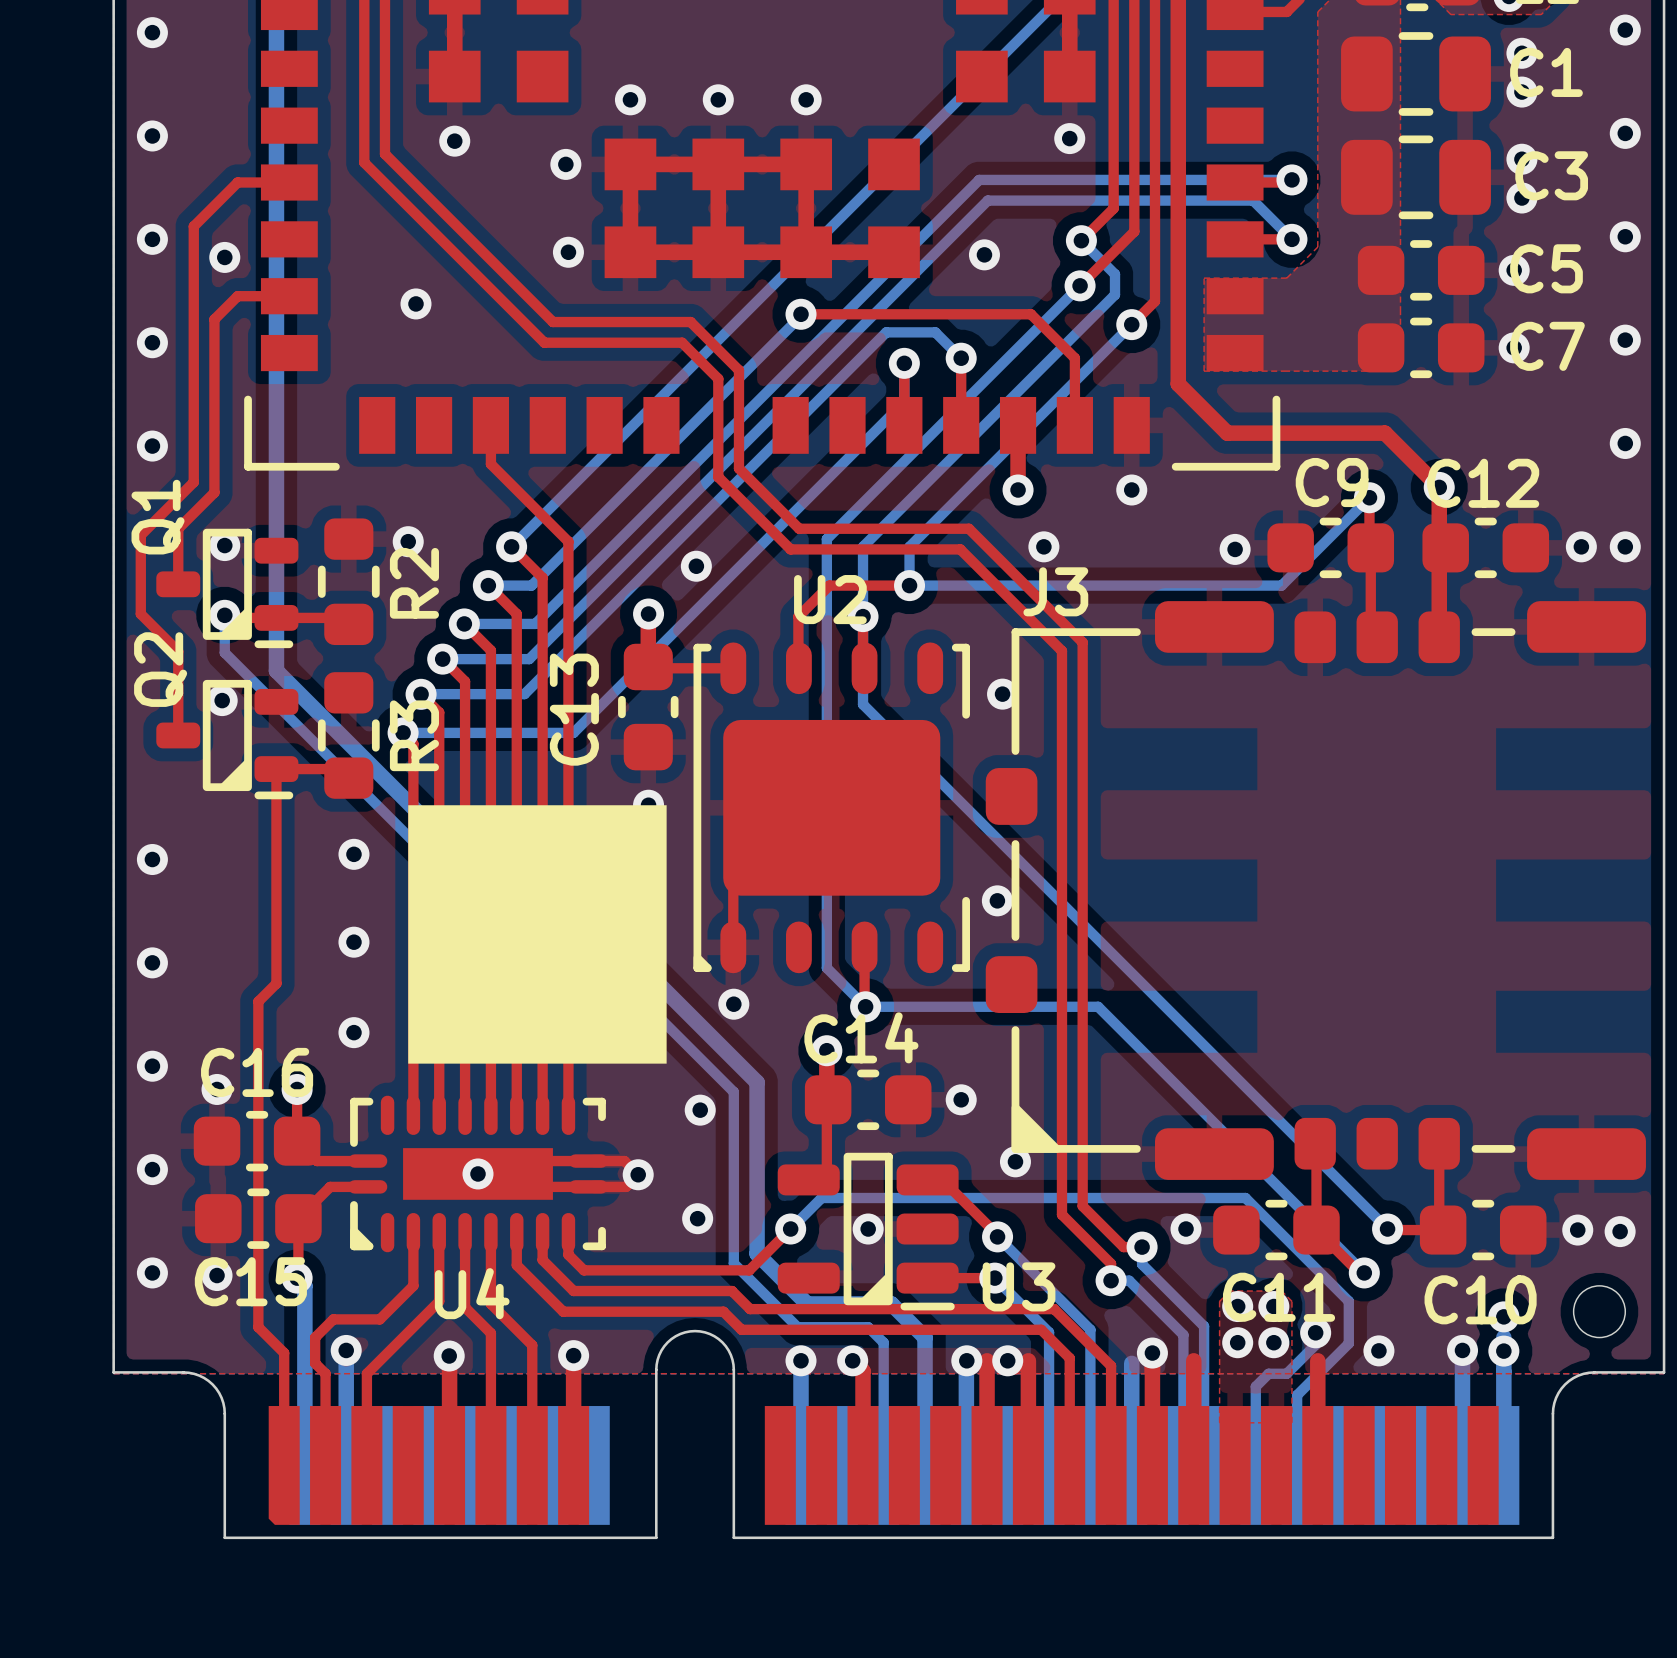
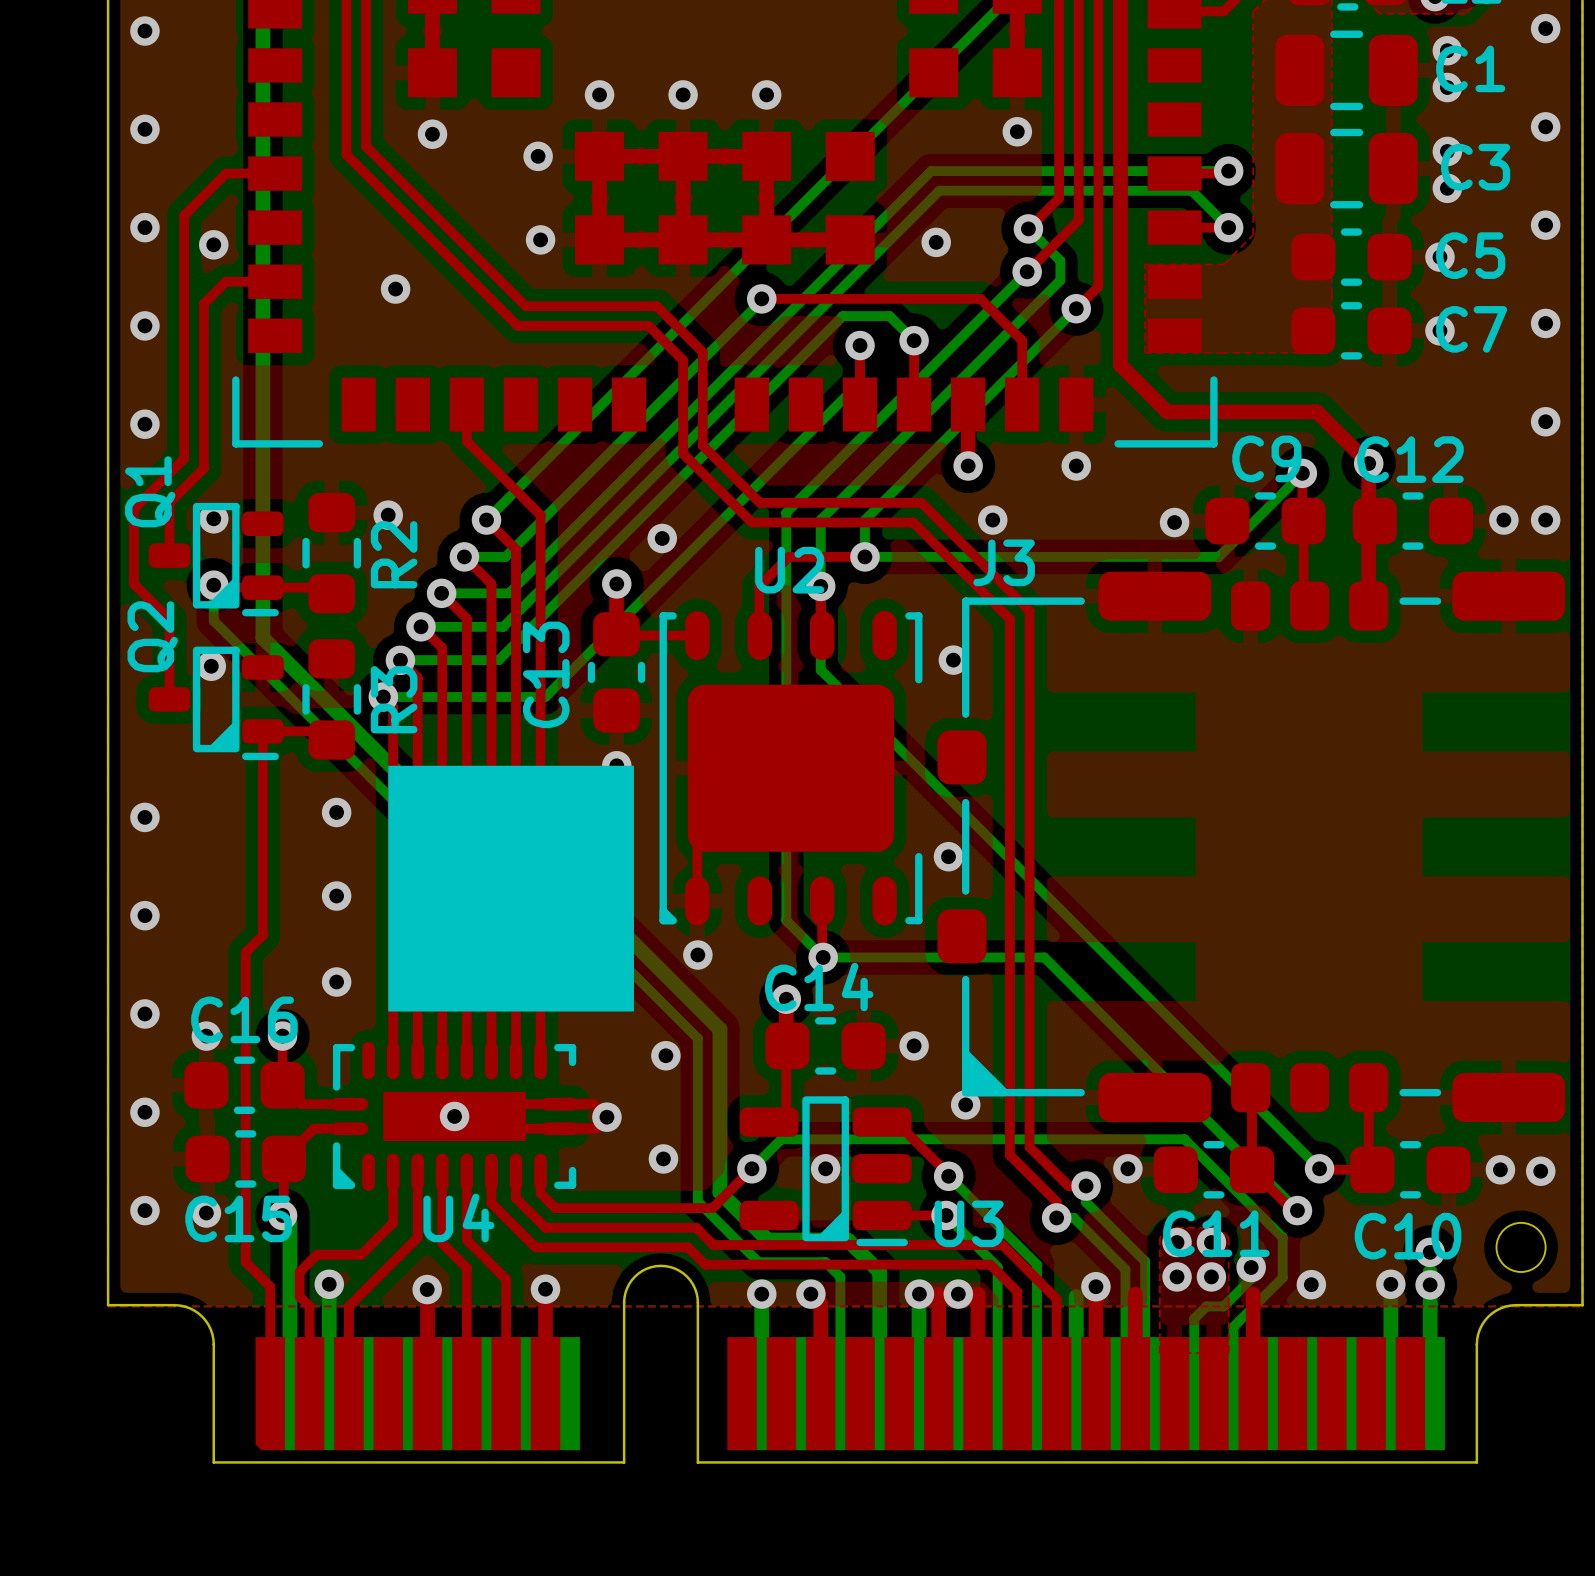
U4 name position: U4 (472, 1293) -> U4 (458, 1217)

